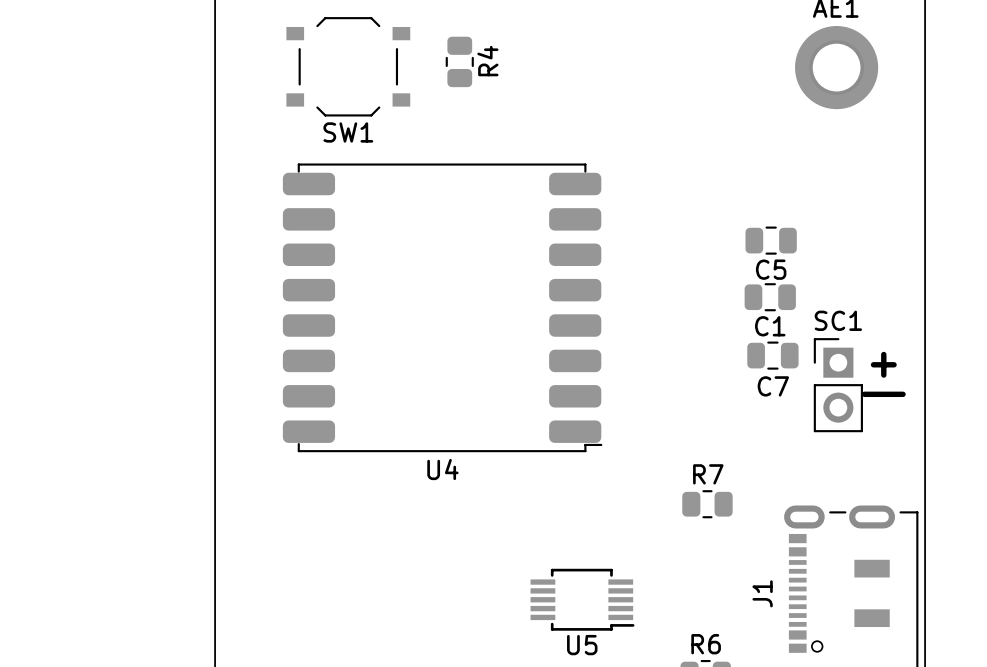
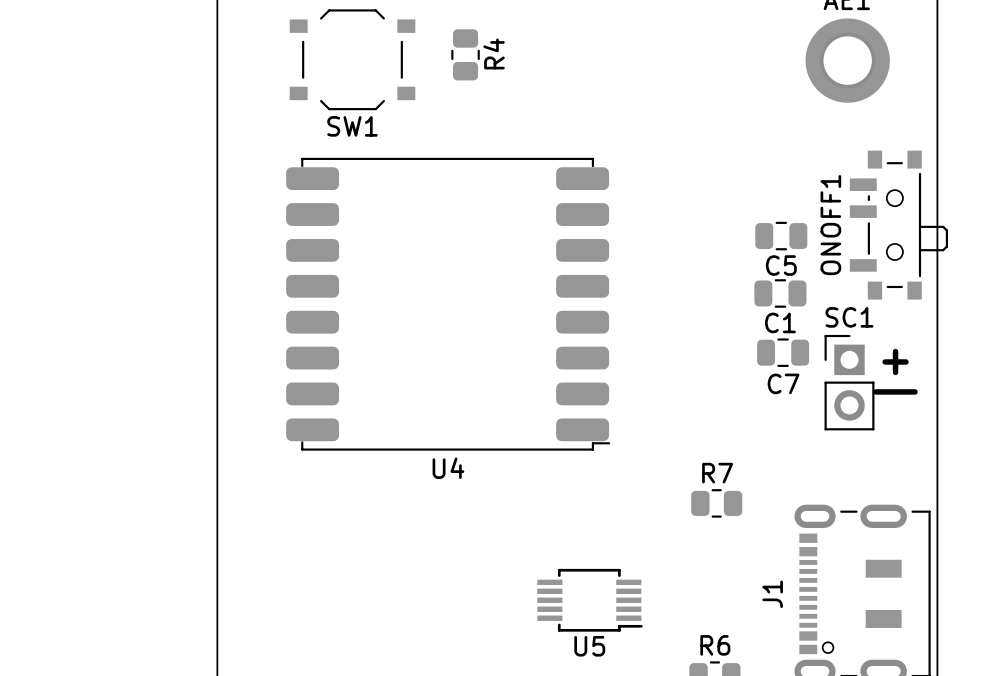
ONOFF1: none -> (898, 225)

